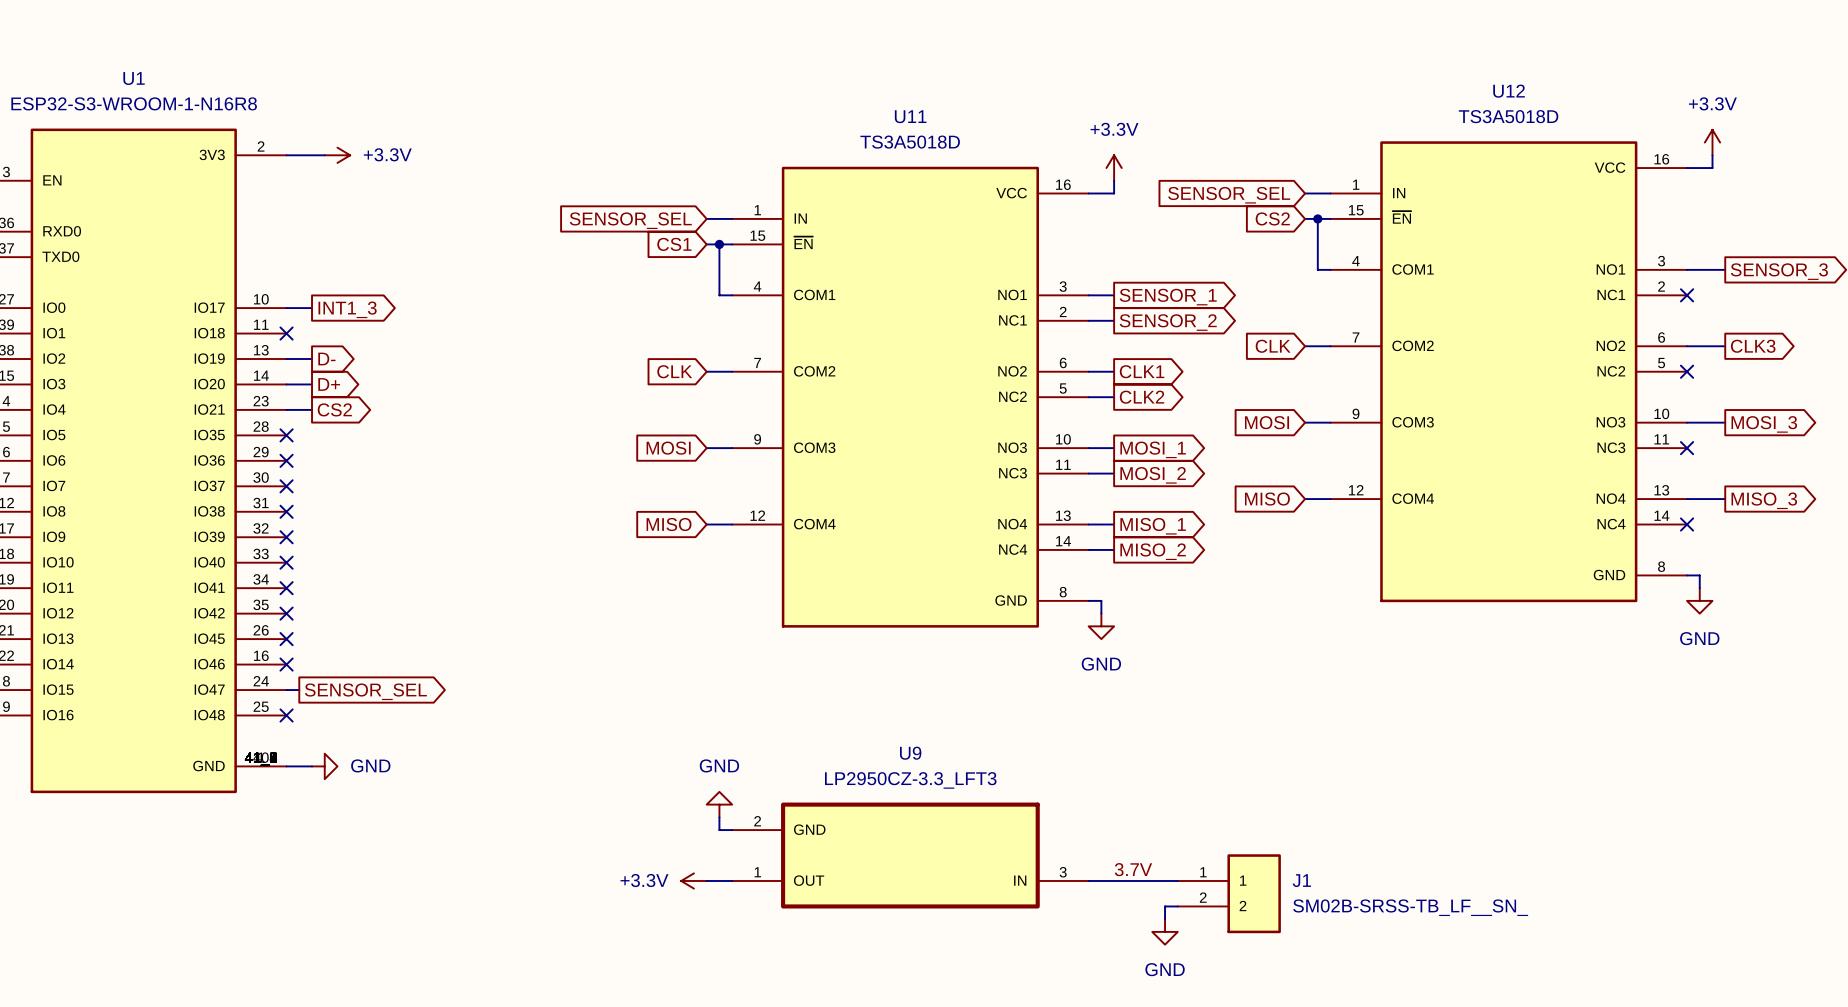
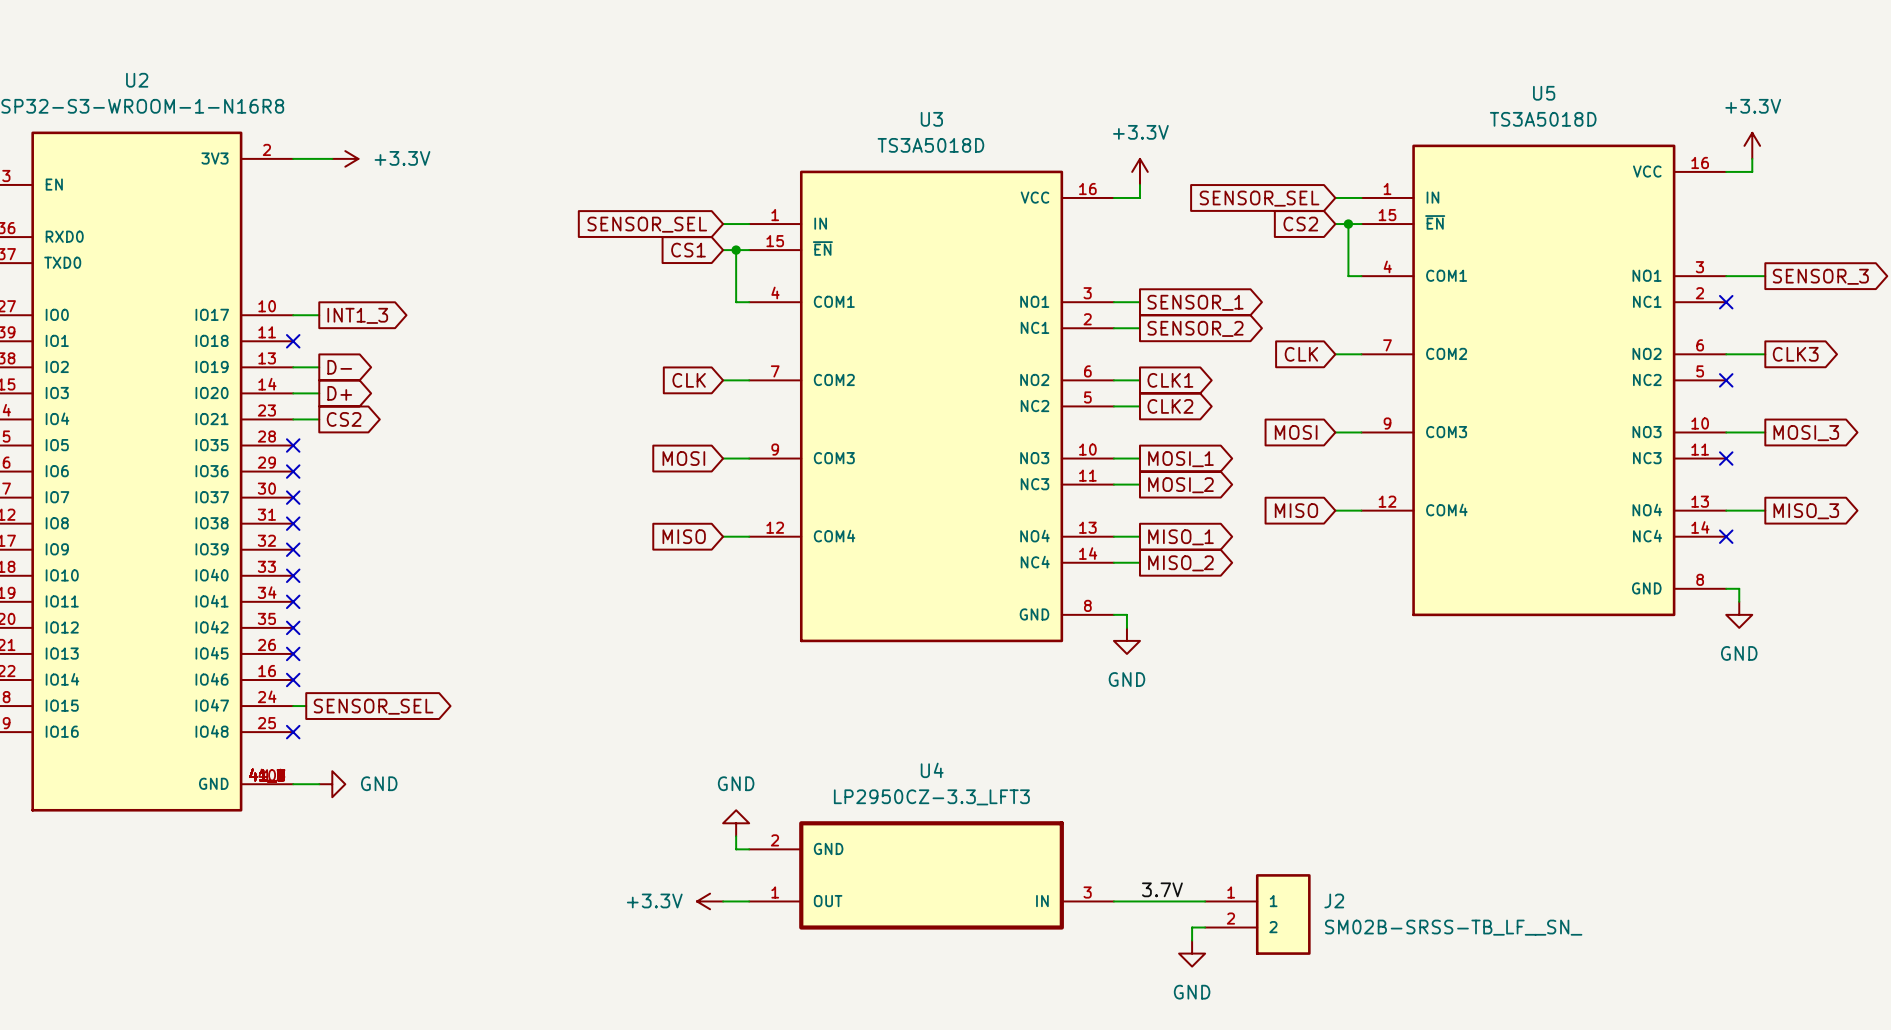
U1 name: U1 (134, 78) -> U2 (137, 80)
U12 name: U12 (1509, 91) -> U5 (1544, 93)
U11 name: U11 (910, 116) -> U3 (931, 119)
U9 name: U9 (910, 753) -> U4 (932, 770)
J1 name: J1 (1301, 880) -> J2 (1334, 900)

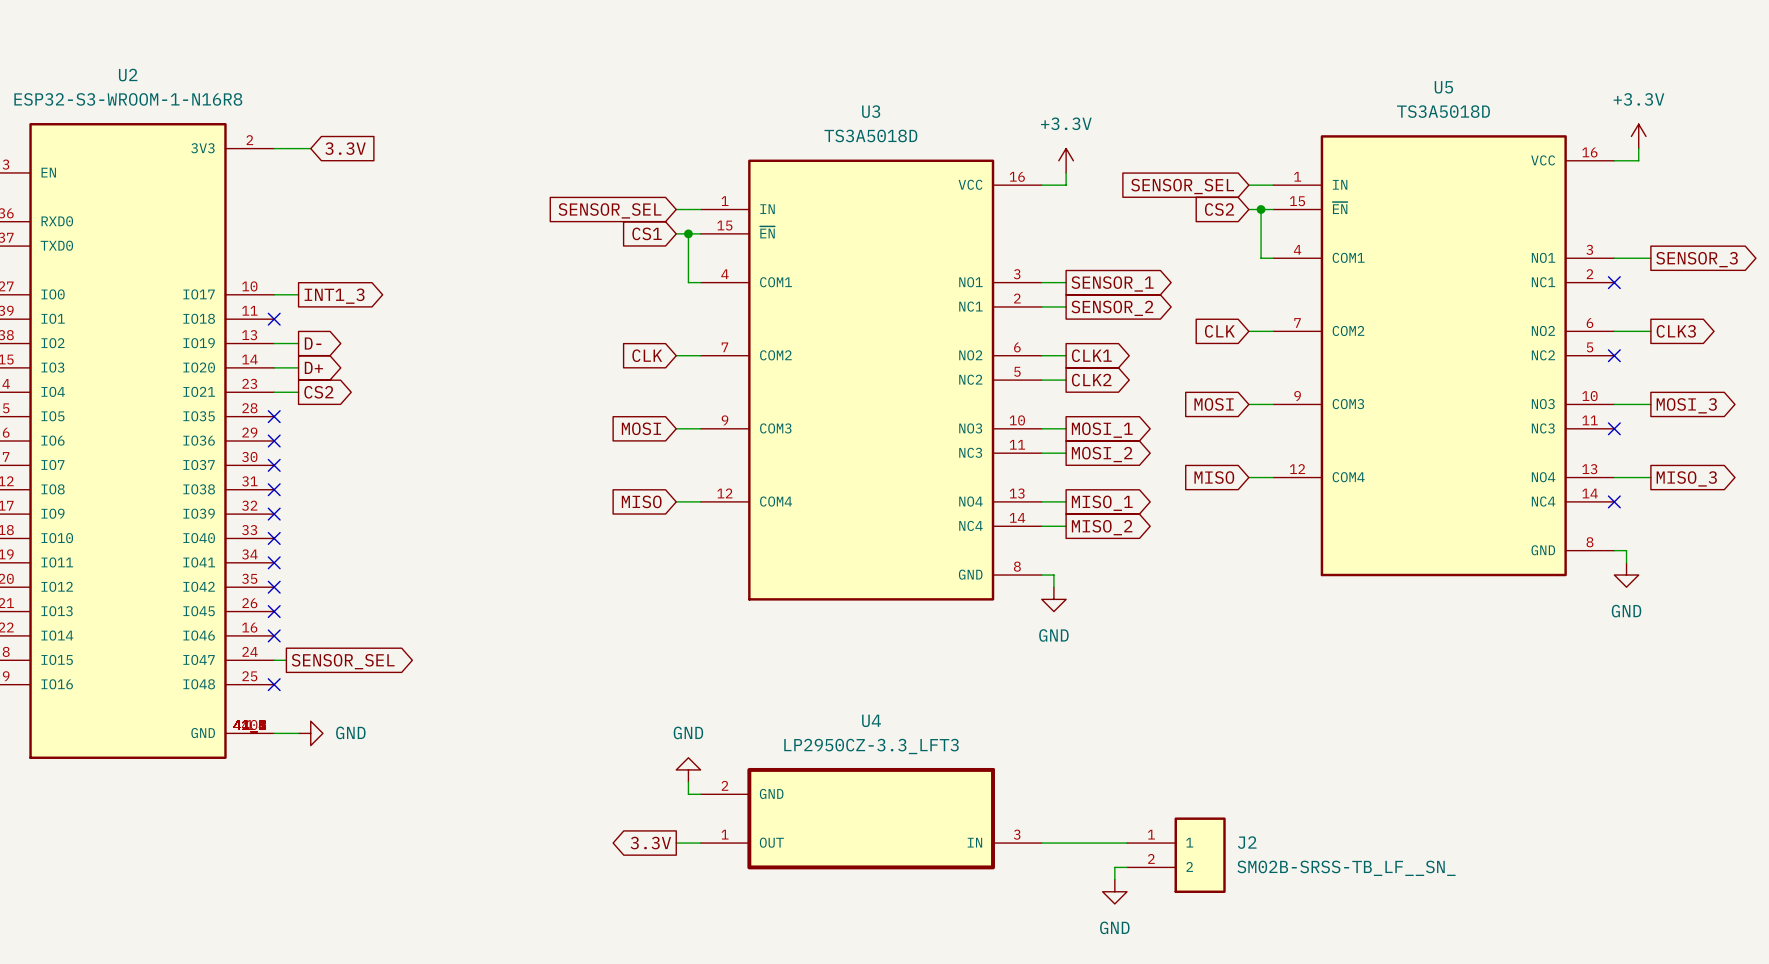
power symbol: +3.3V (345, 158) -> none
global label: none -> 3.3V (345, 148)
label: 3.7V (1162, 889) -> none
global label: none -> 3.3V (650, 843)
power symbol: +3.3V (710, 901) -> none

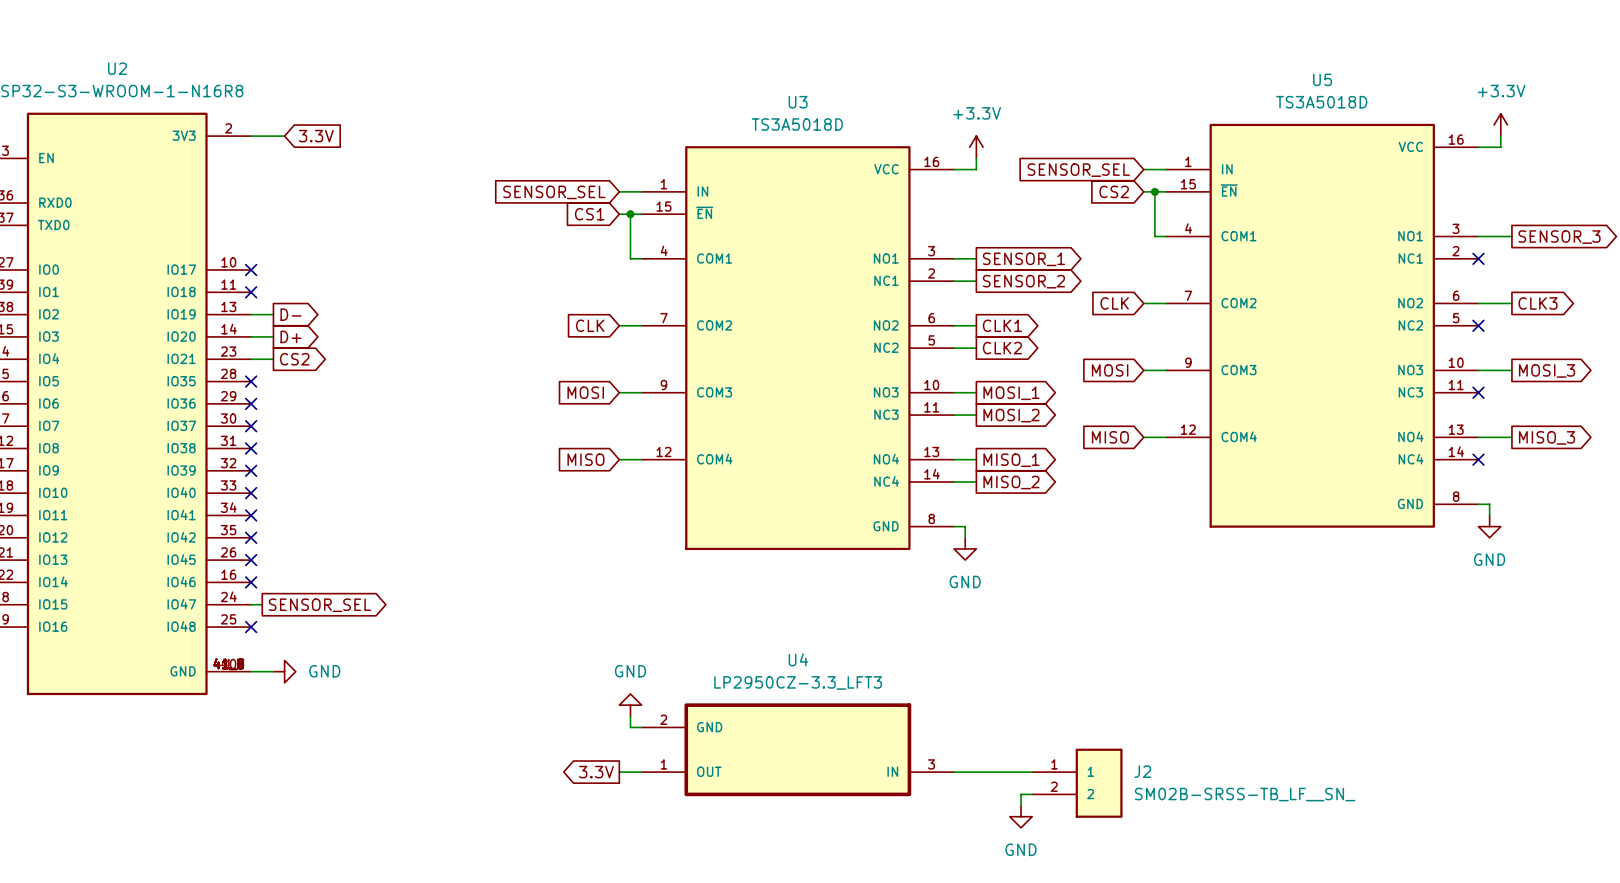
wire: (274, 294) (298, 294) -> none
no-connect mark: none -> (251, 269)
global label: INT1_3 (334, 296) -> none

